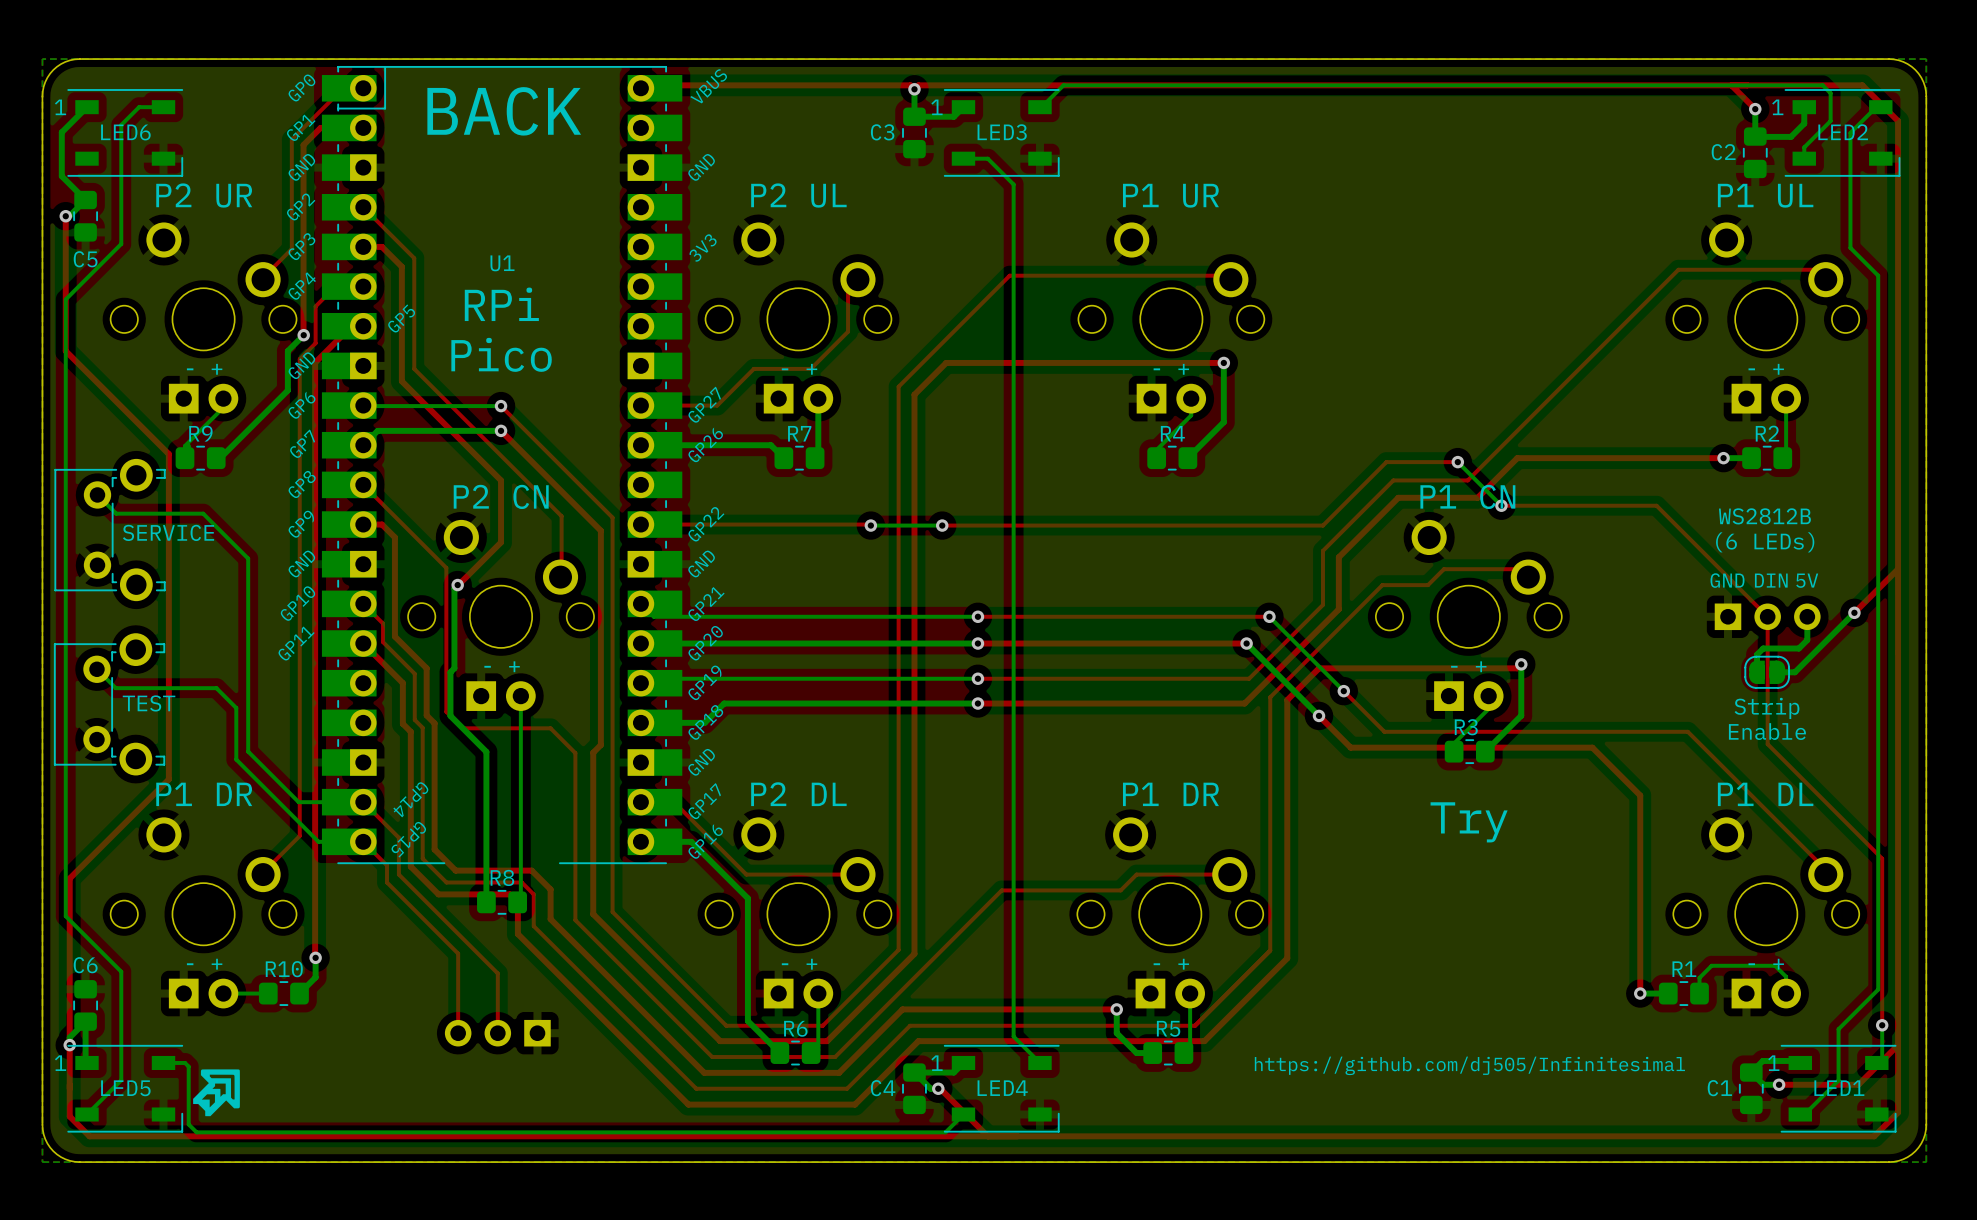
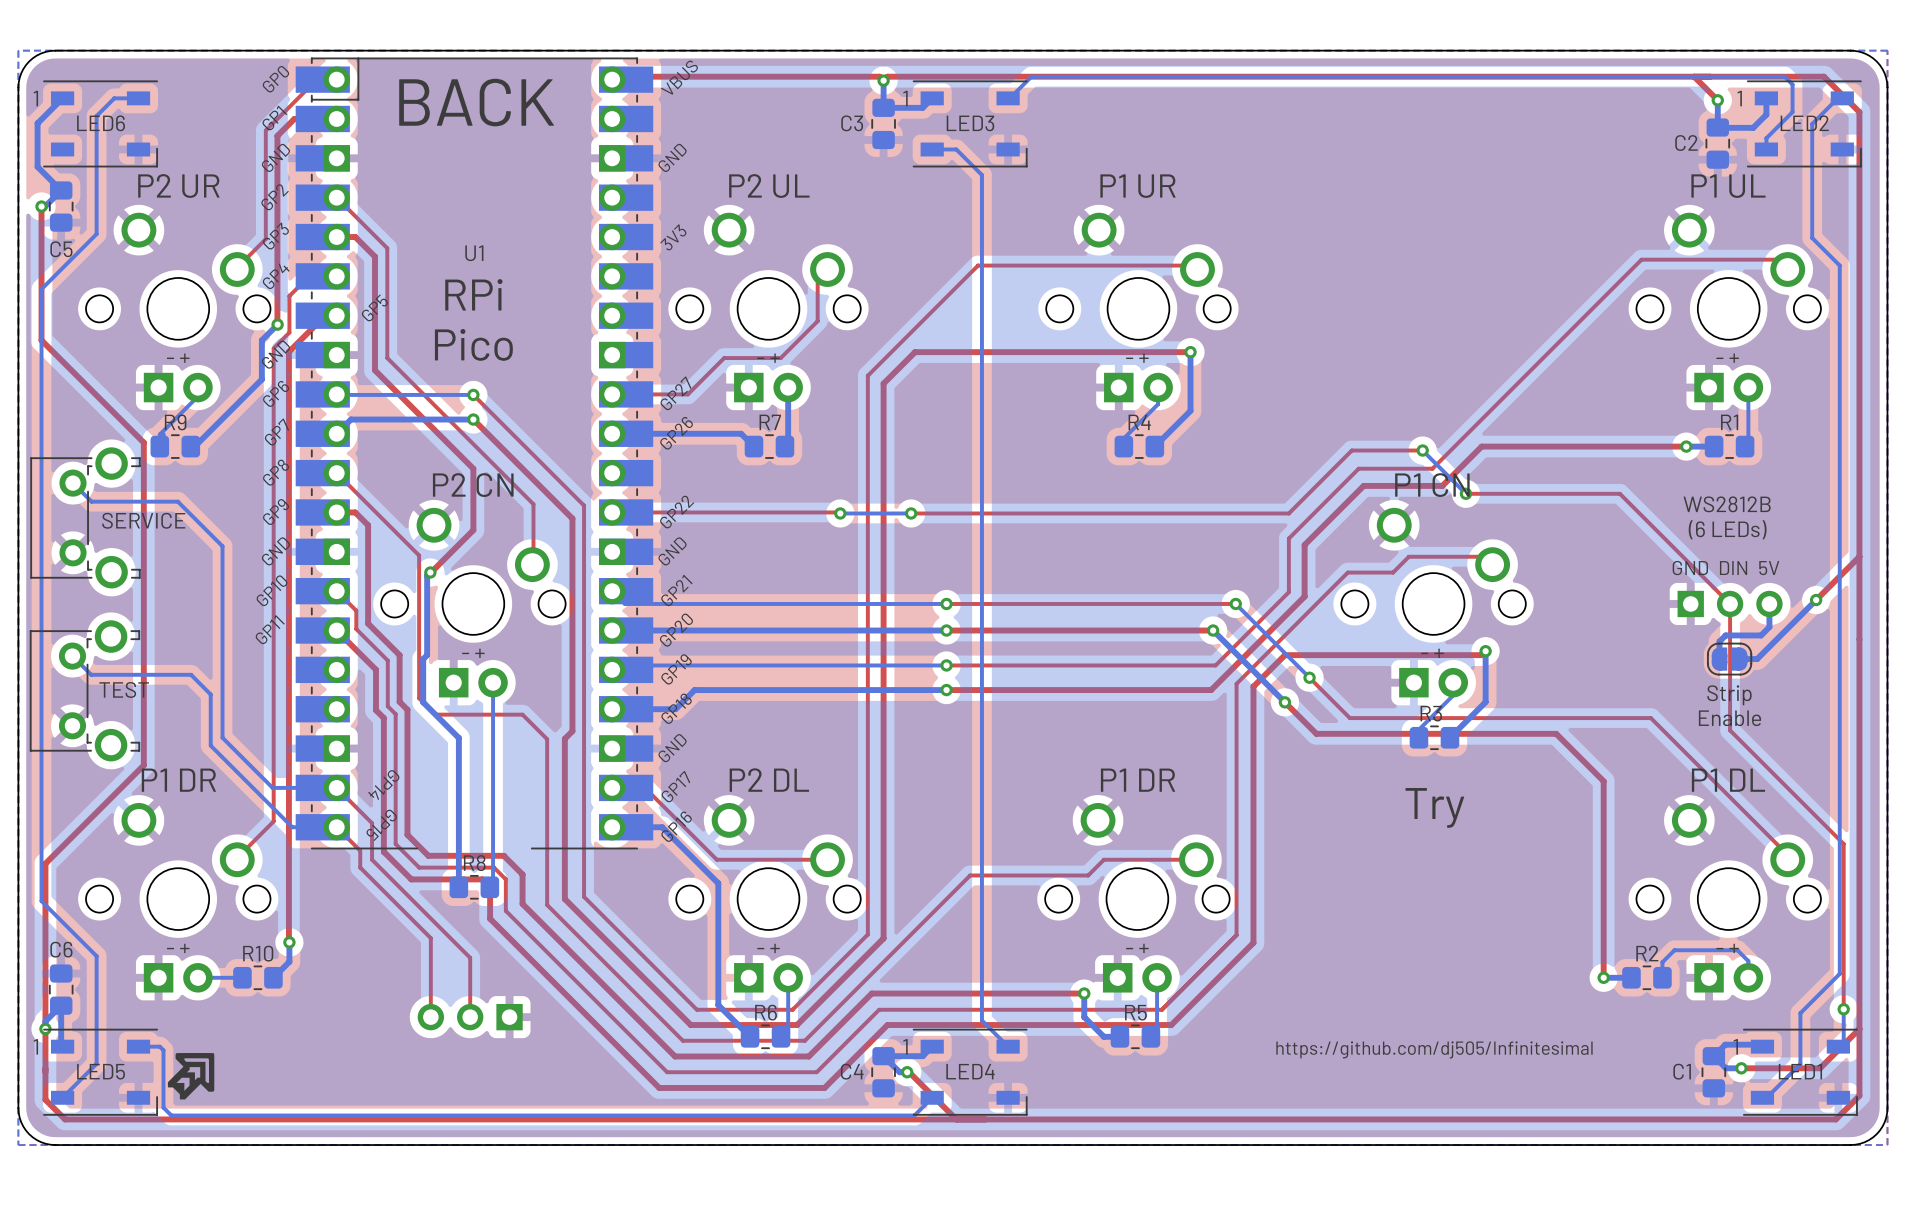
R2 name: R2 (1767, 433) -> R1 (1729, 422)
R1 name: R1 (1684, 969) -> R2 (1647, 953)

